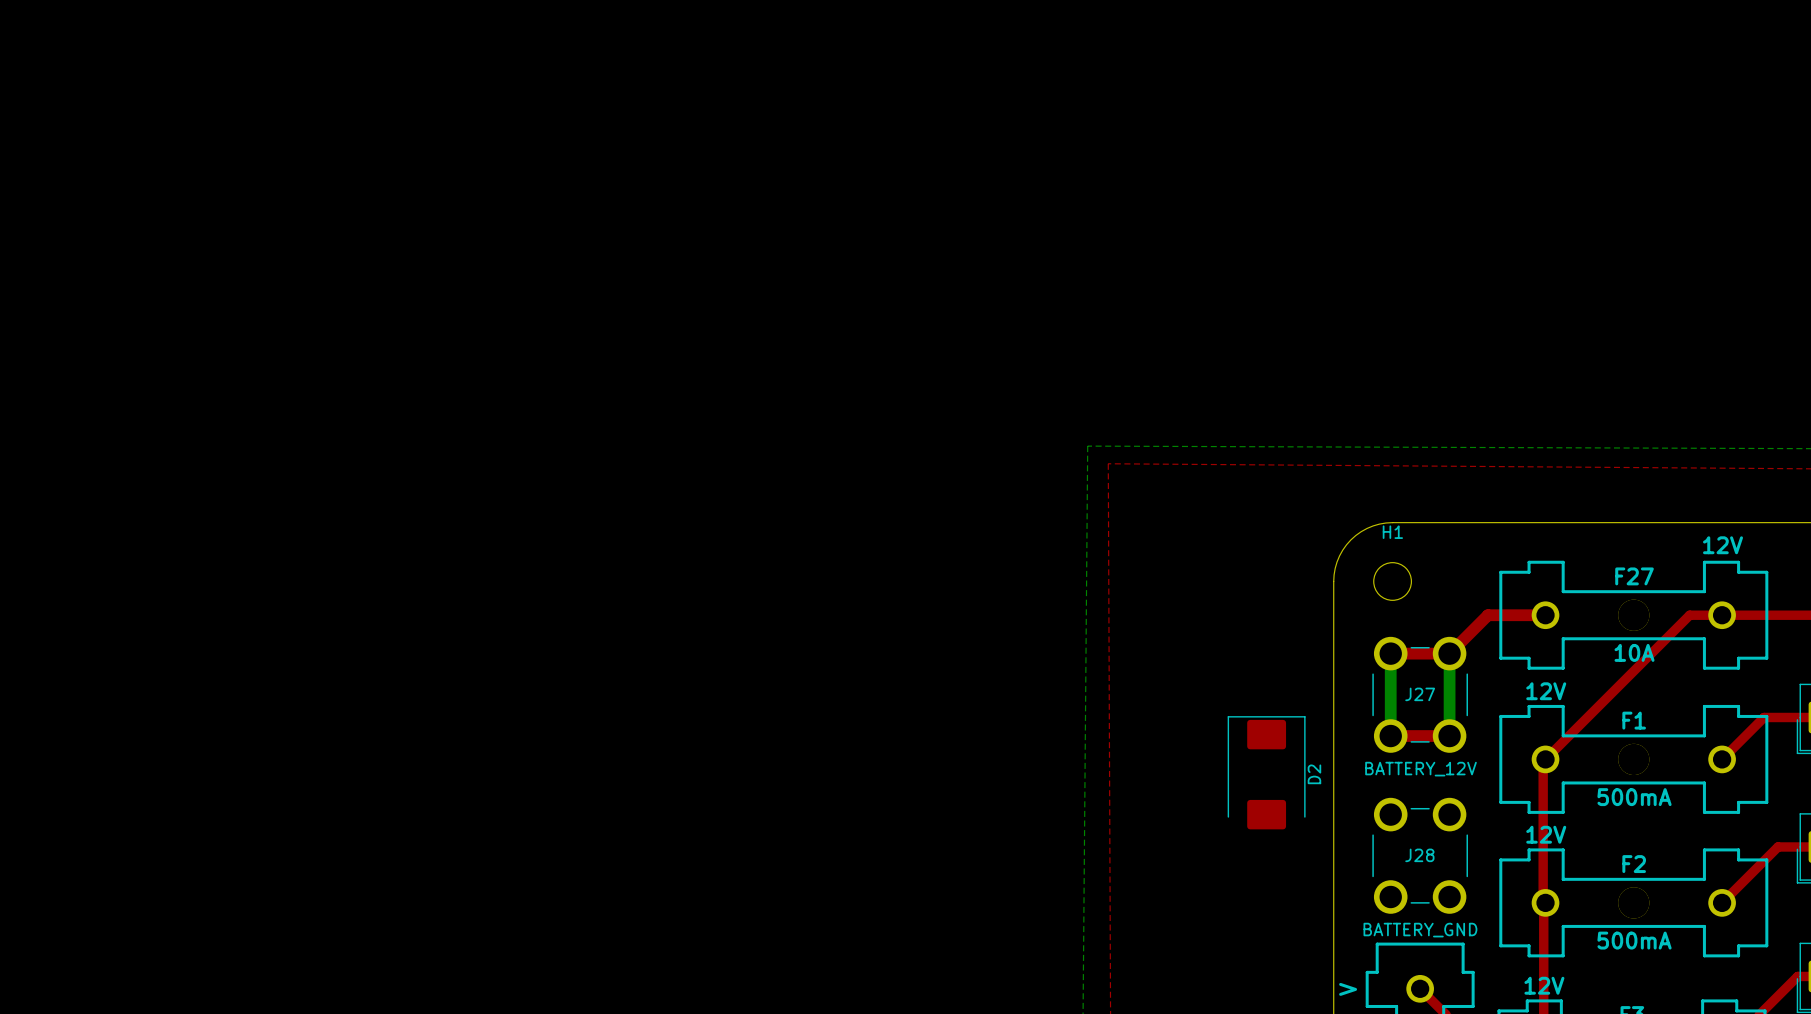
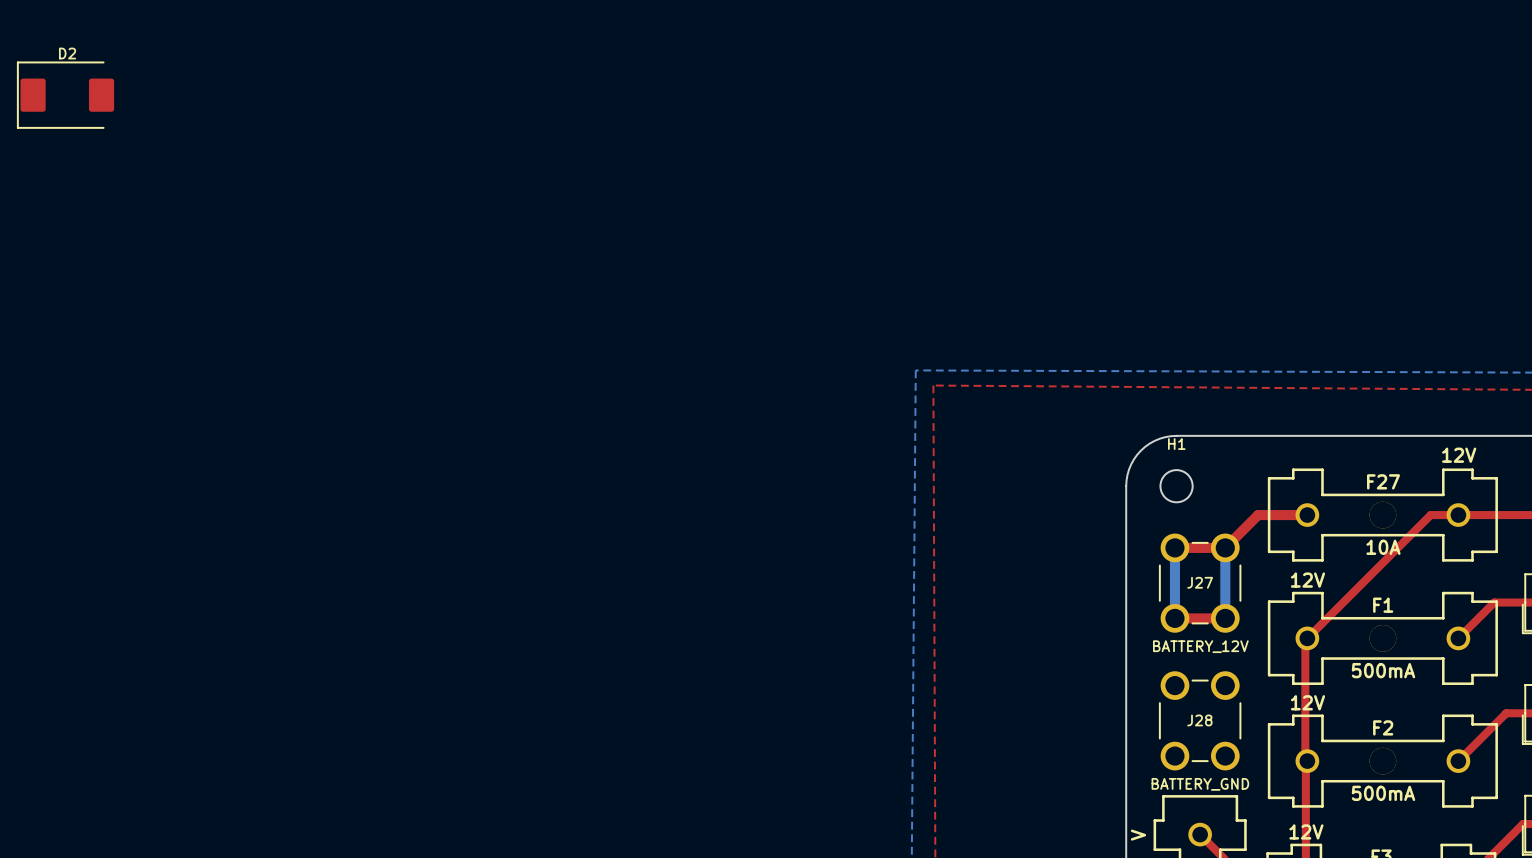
D2 rotation: 0° (1266, 772) -> 90° counterclockwise (65, 95)
D2 position: (1266, 772) -> (65, 95)

